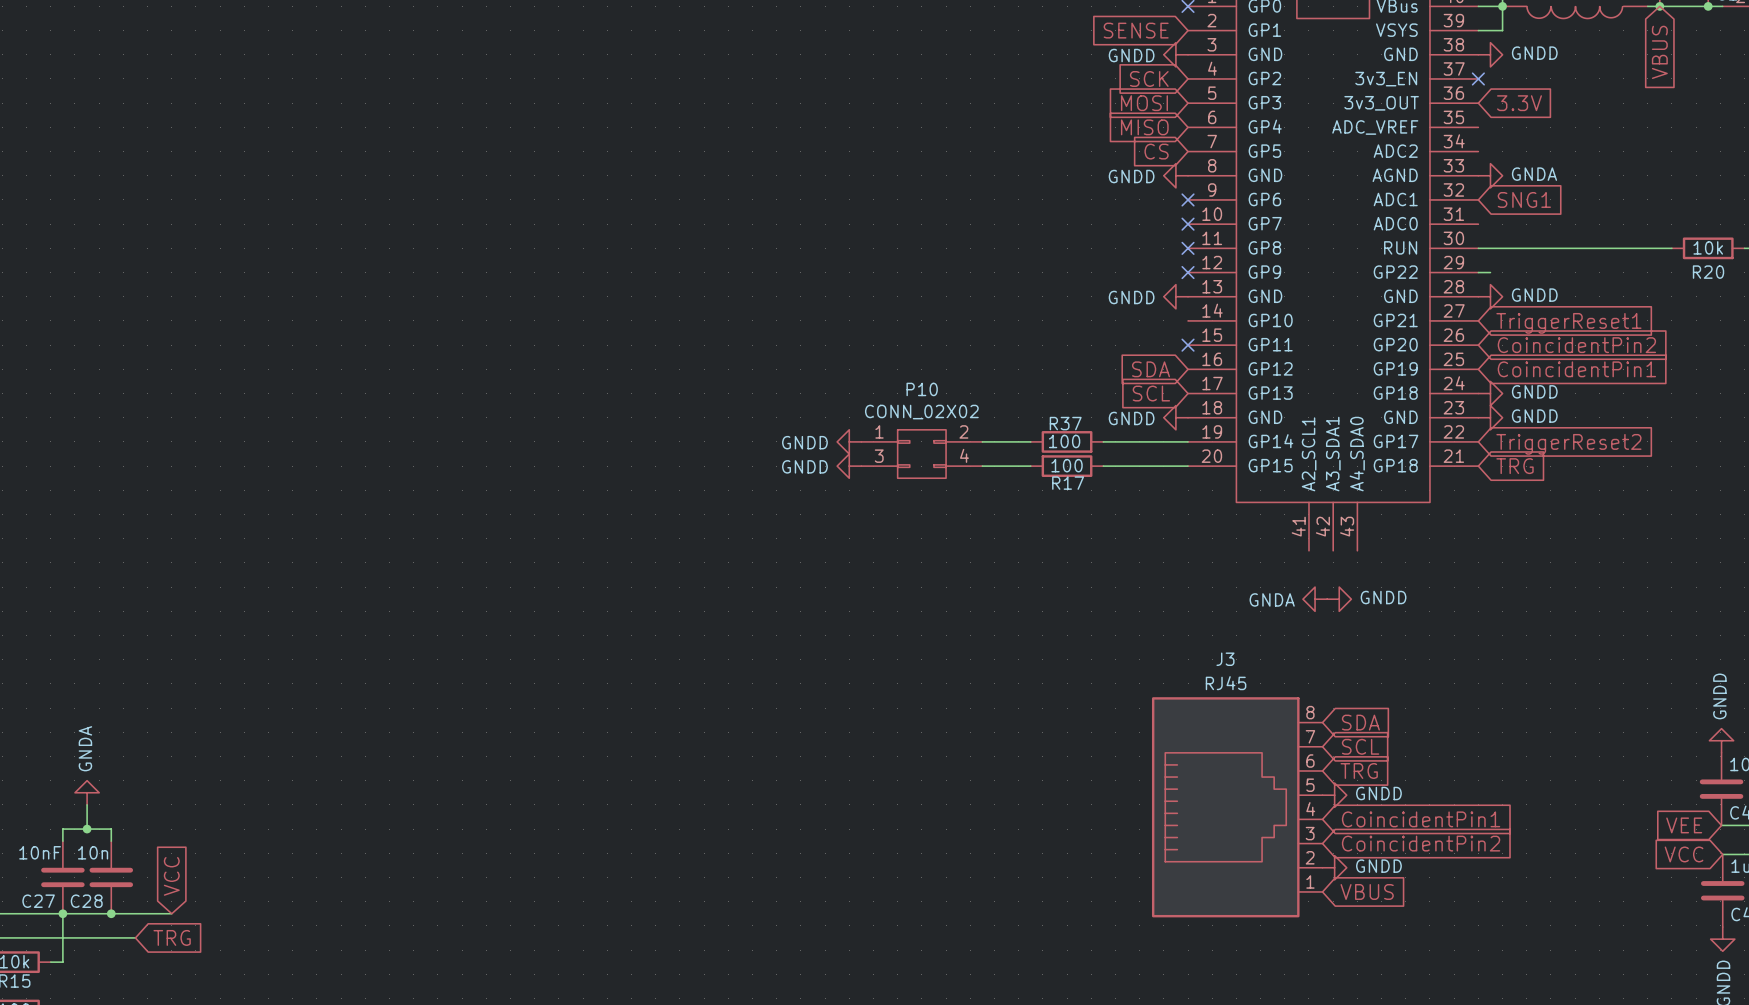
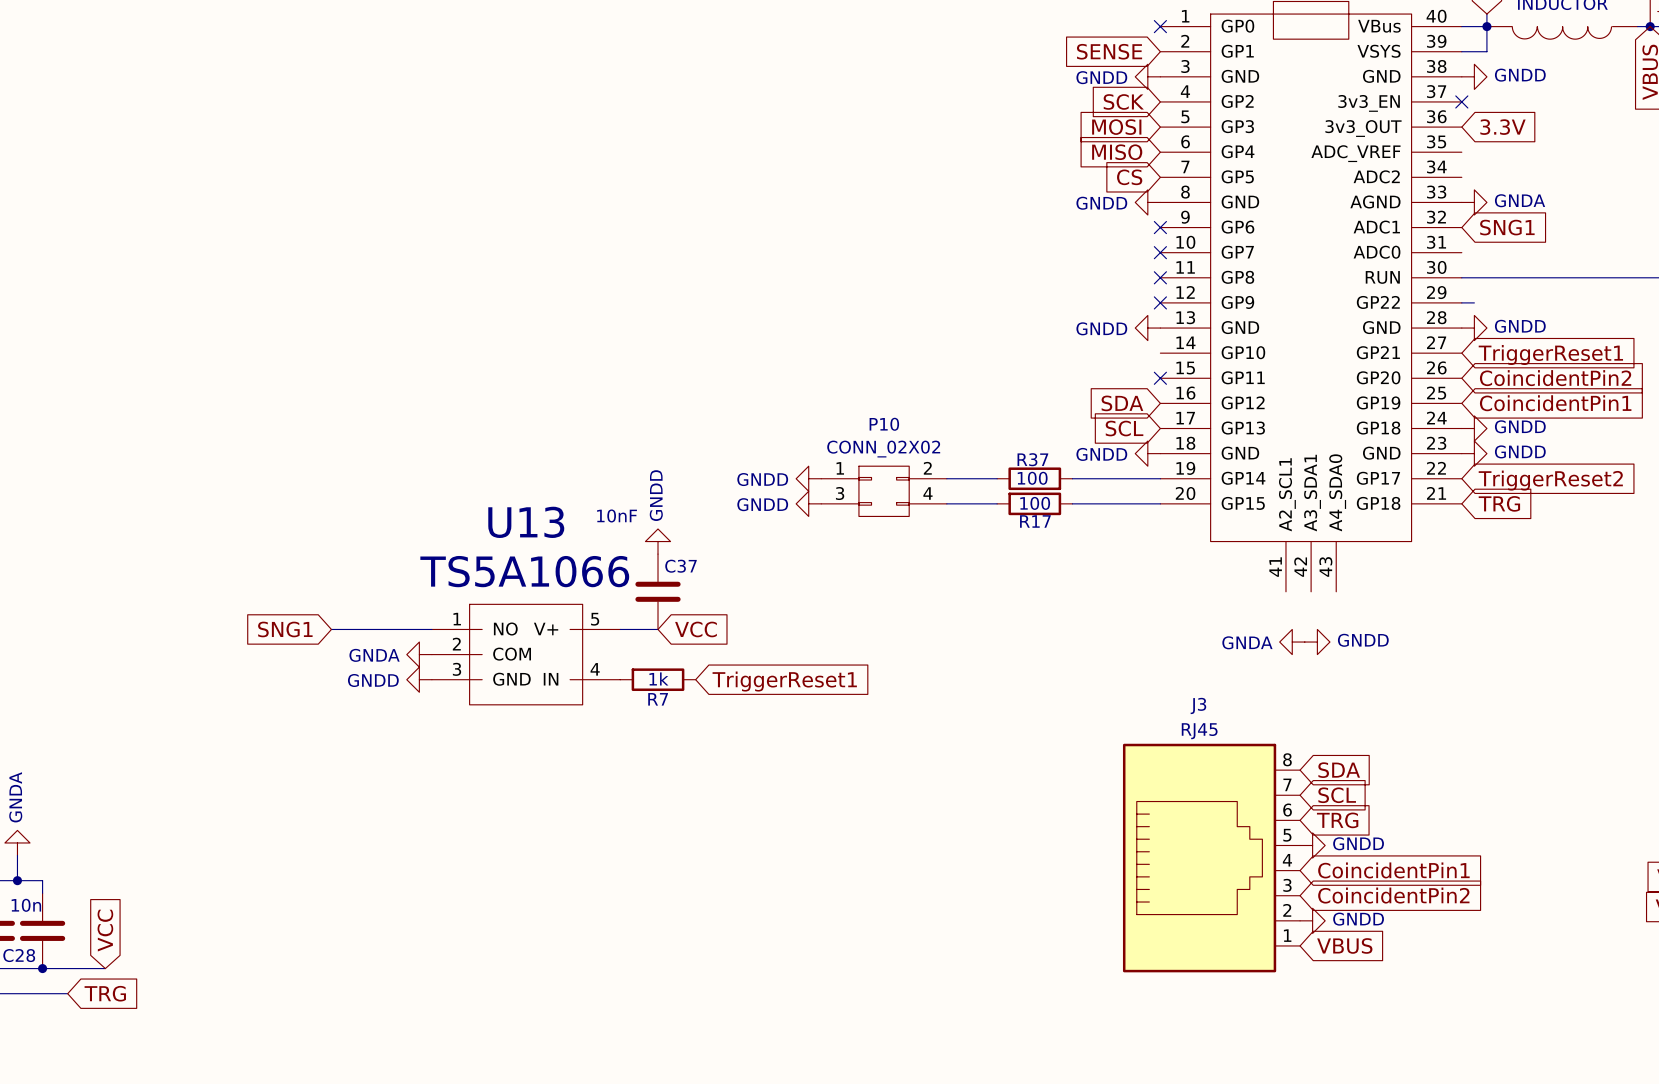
power symbol: none -> GNDD (658, 541)
C37: none -> 10nF (658, 591)
global label: none -> SNG1 (285, 629)
wire: none -> (331, 629) (431, 629)
wire: none -> (620, 629) (658, 629)
global label: none -> VCC (695, 629)
power symbol: none -> GNDA (419, 654)
U13: none -> TS5A1066 (526, 654)
power symbol: none -> GNDD (419, 679)
R7: none -> 1k (658, 679)
global label: none -> TriggerReset1 (784, 681)

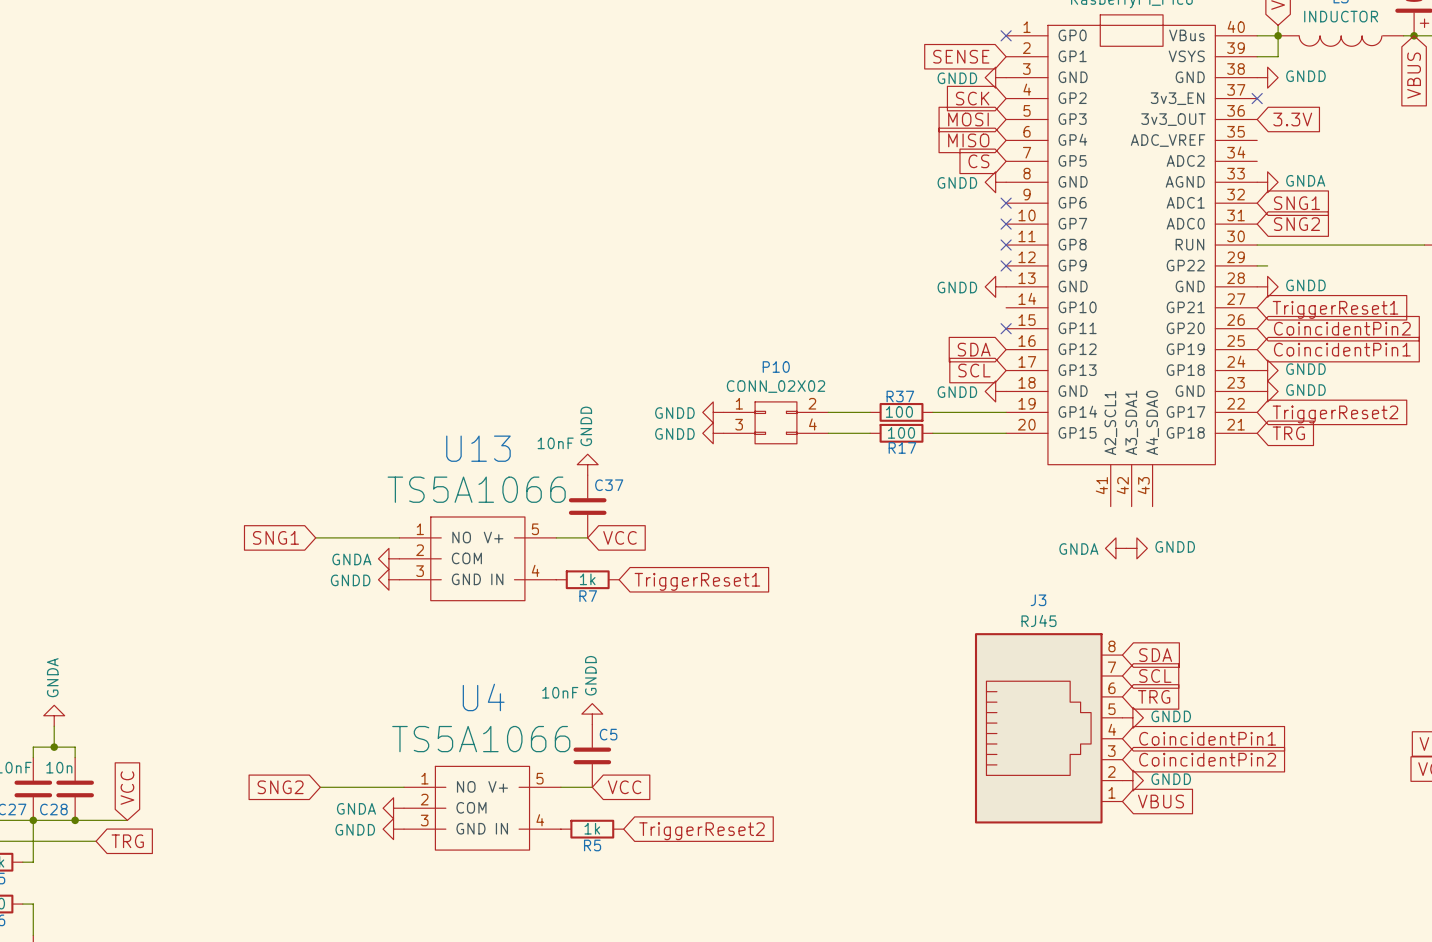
global label: none -> SNG2 (1296, 224)
power symbol: none -> GNDD (592, 714)
C5: none -> 10nF (592, 755)
global label: none -> SNG2 (280, 787)
wire: none -> (320, 787) (404, 787)
wire: none -> (560, 787) (592, 787)
global label: none -> VCC (624, 787)
power symbol: none -> GNDA (393, 808)
U4: none -> TS5A1066 (482, 808)
power symbol: none -> GNDD (393, 829)
R5: none -> 1k (592, 829)
global label: none -> TriggerReset2 (701, 831)

